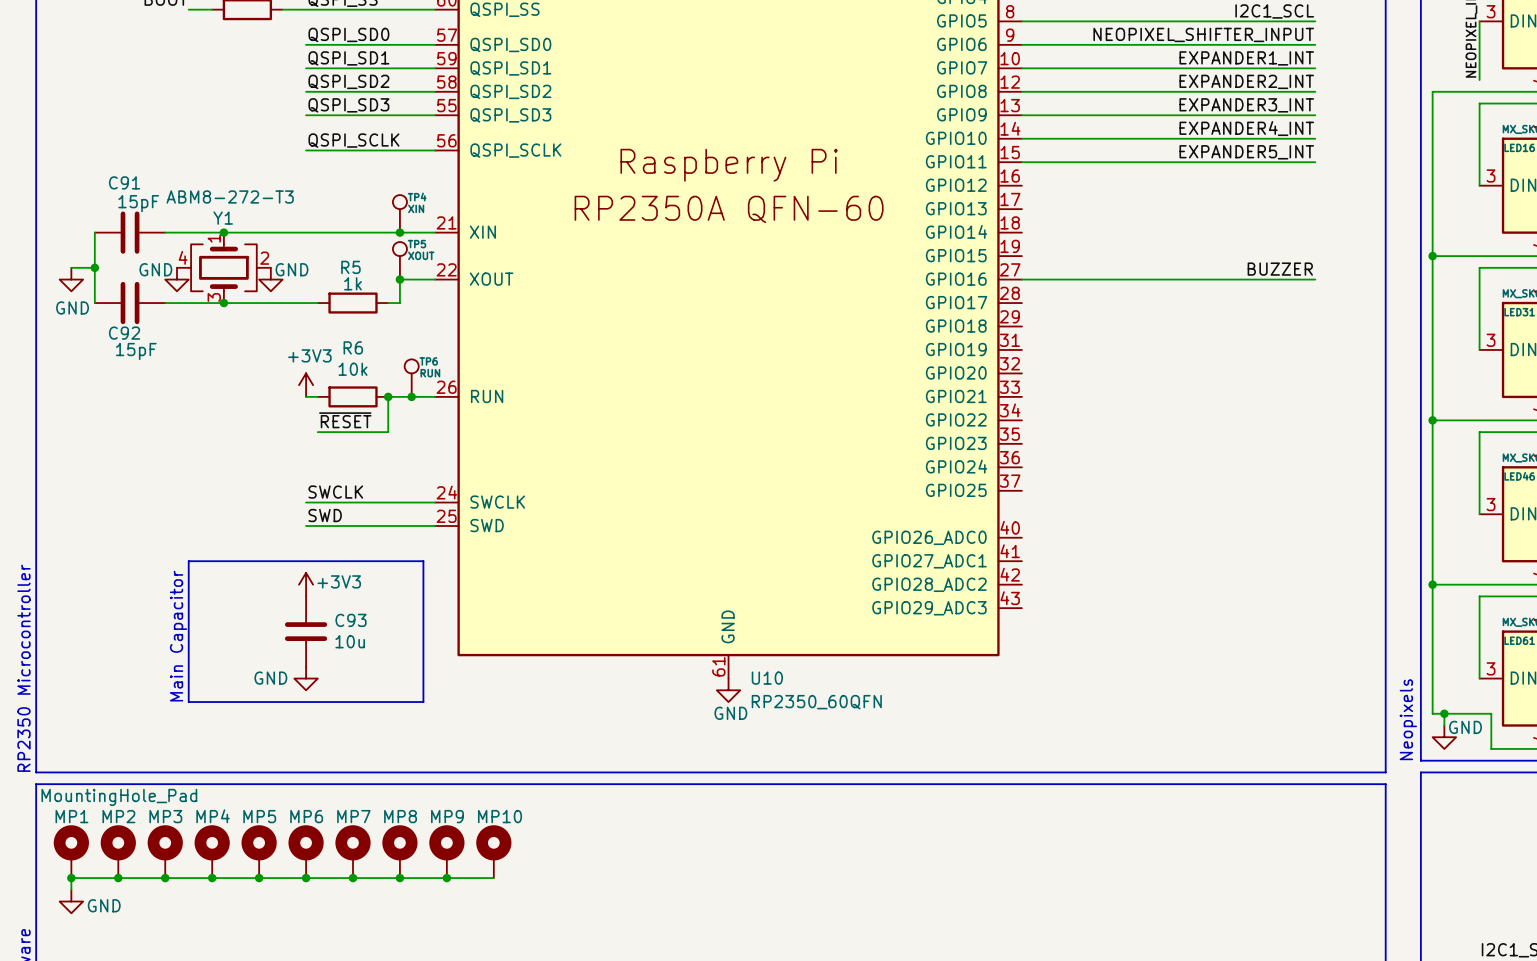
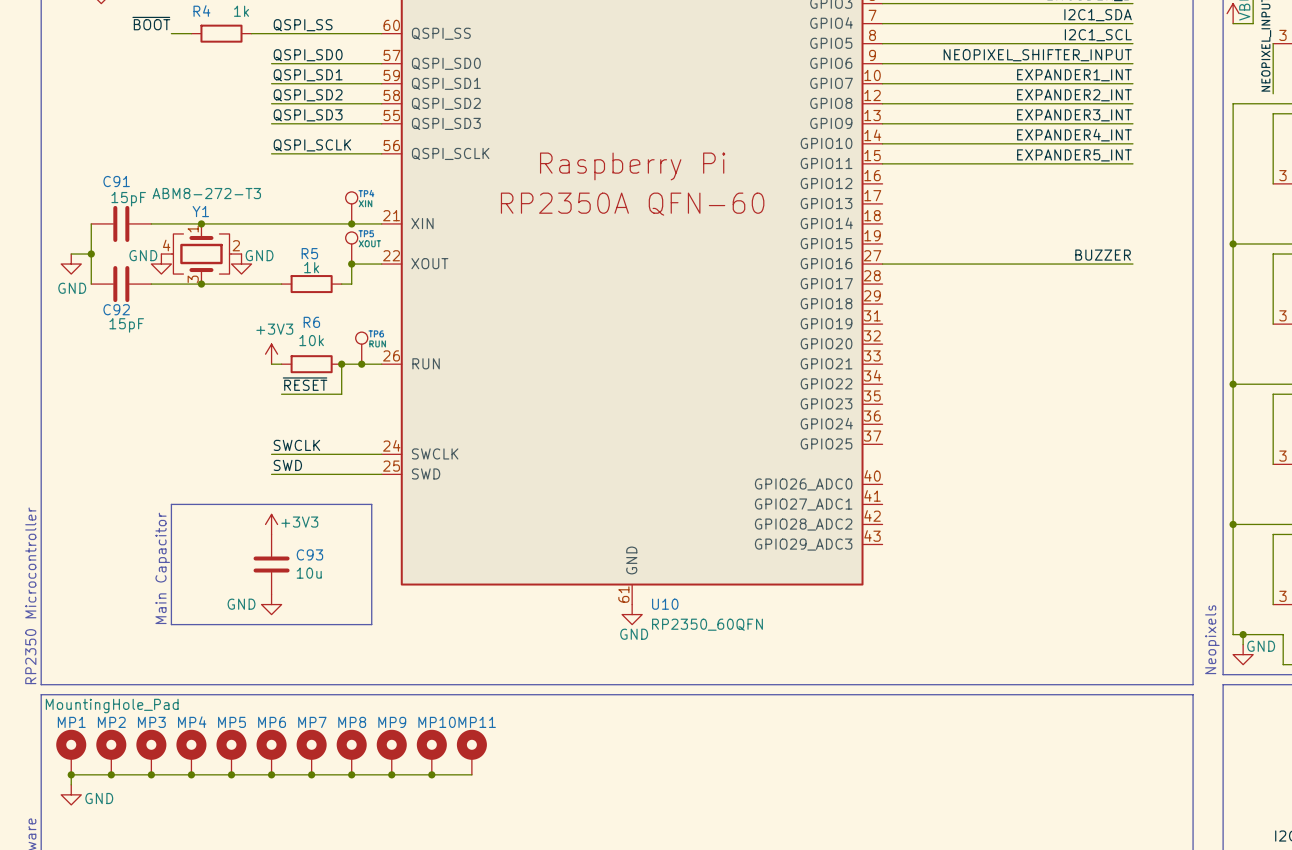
MP11: none -> (471, 752)
wire: none -> (431, 774) (471, 774)
junction: none -> (431, 774)

